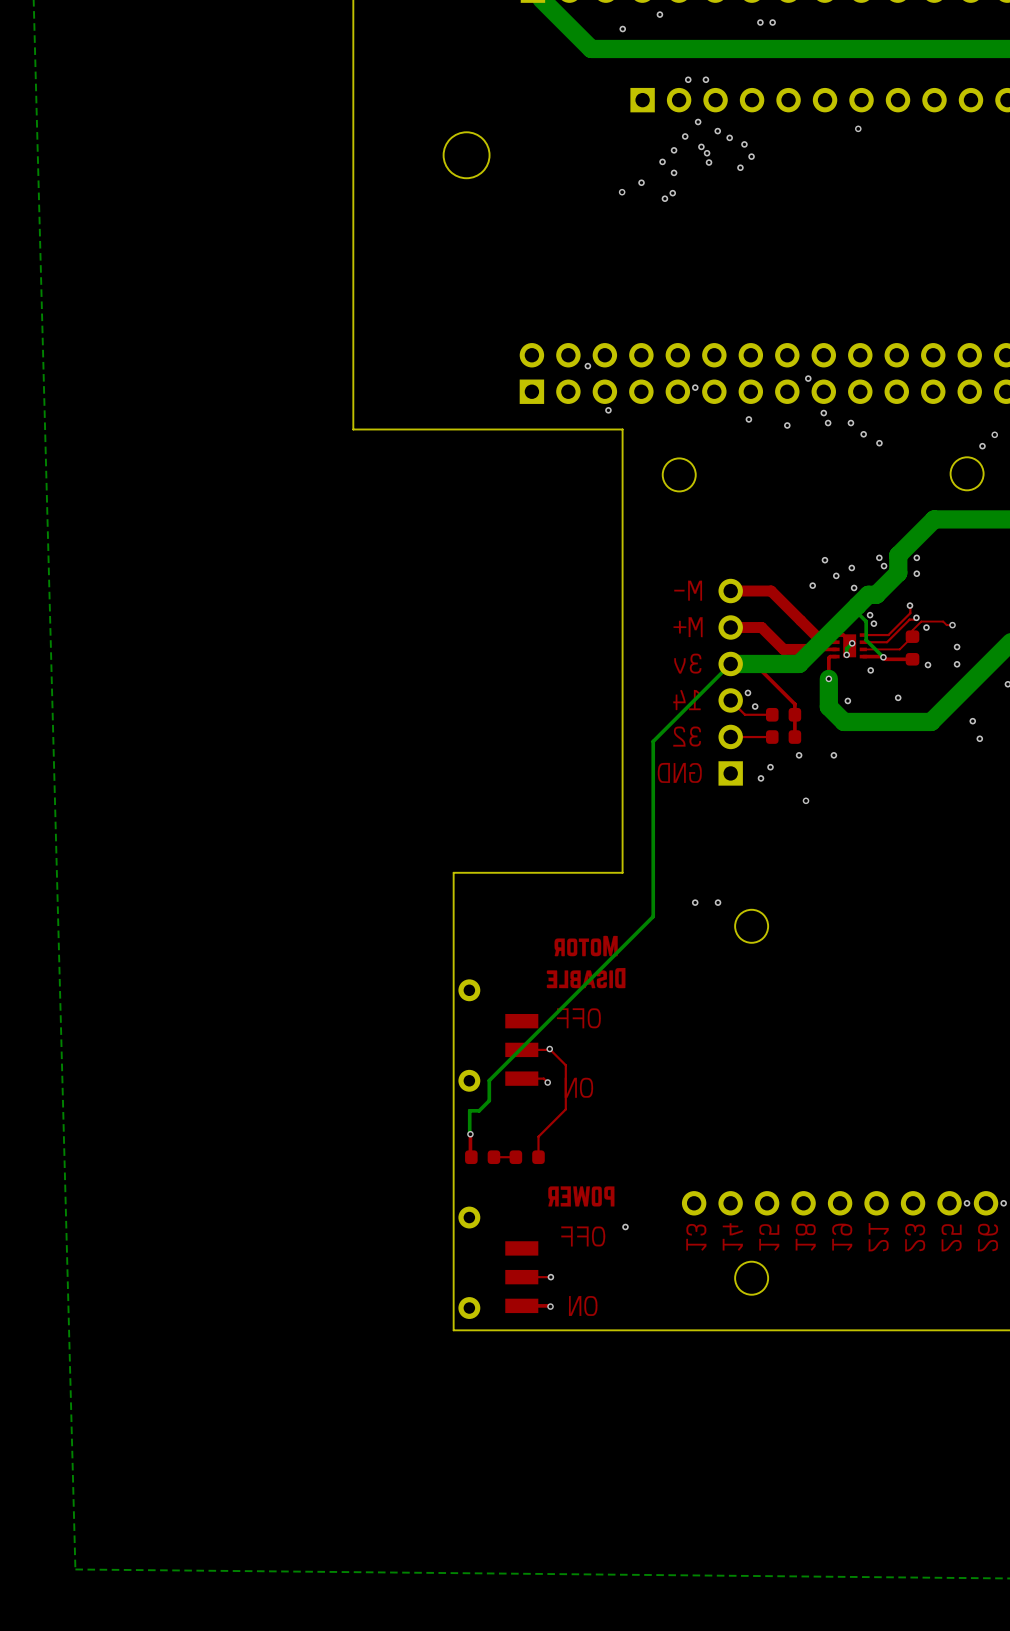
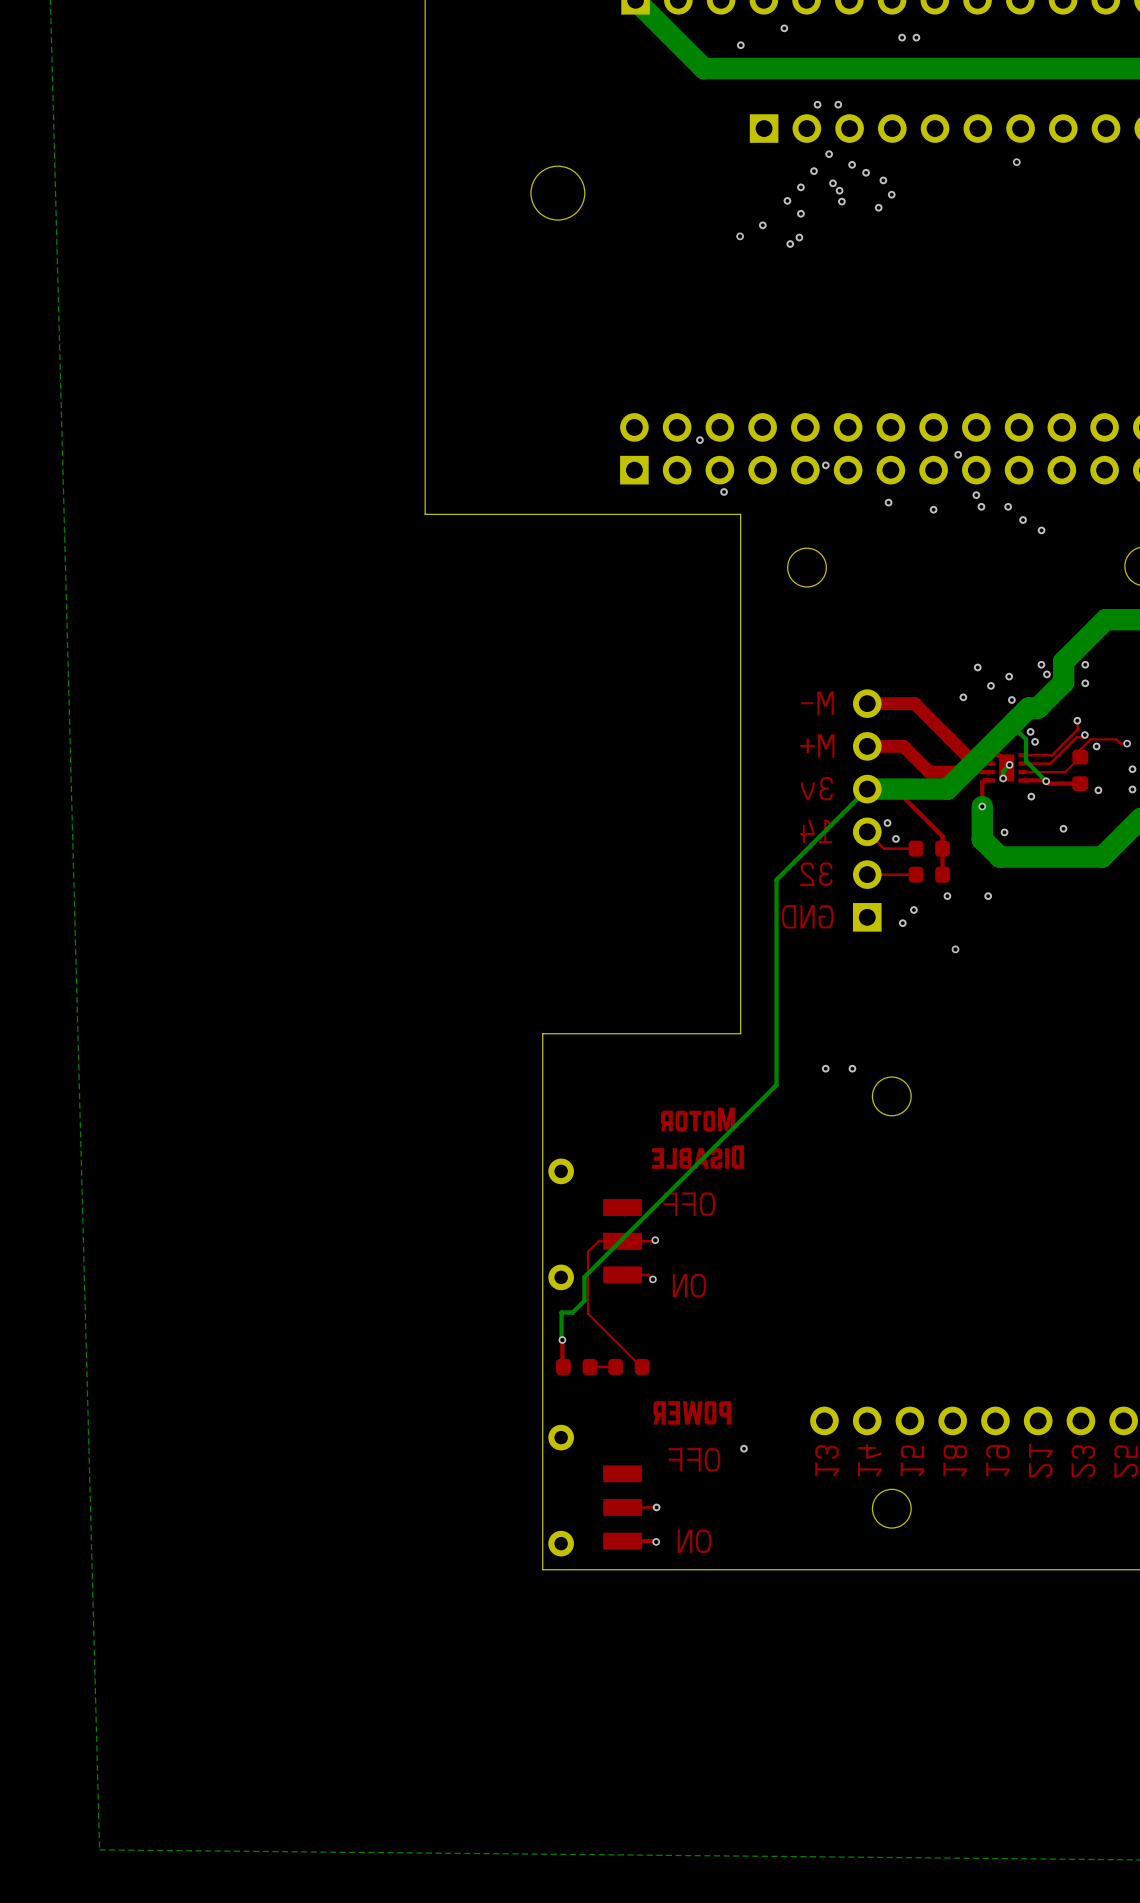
top track: (550, 1049) (565, 1065) (565, 1109) (538, 1136) (538, 1157) -> (622, 1241) (598, 1241) (587, 1251) (587, 1313) (642, 1366)

